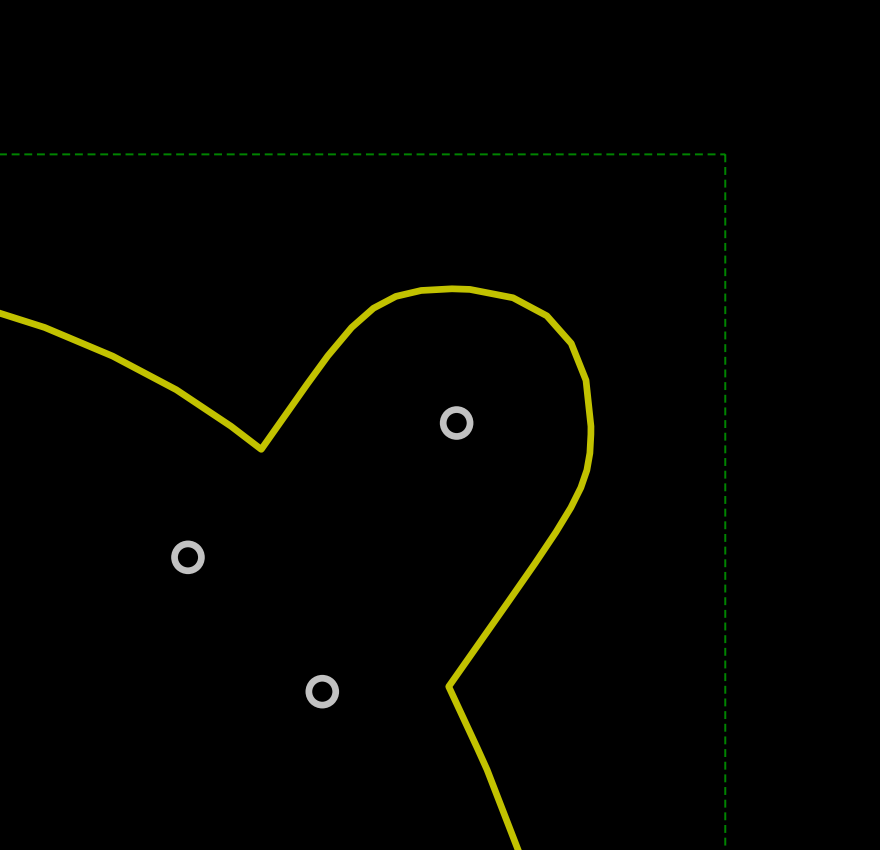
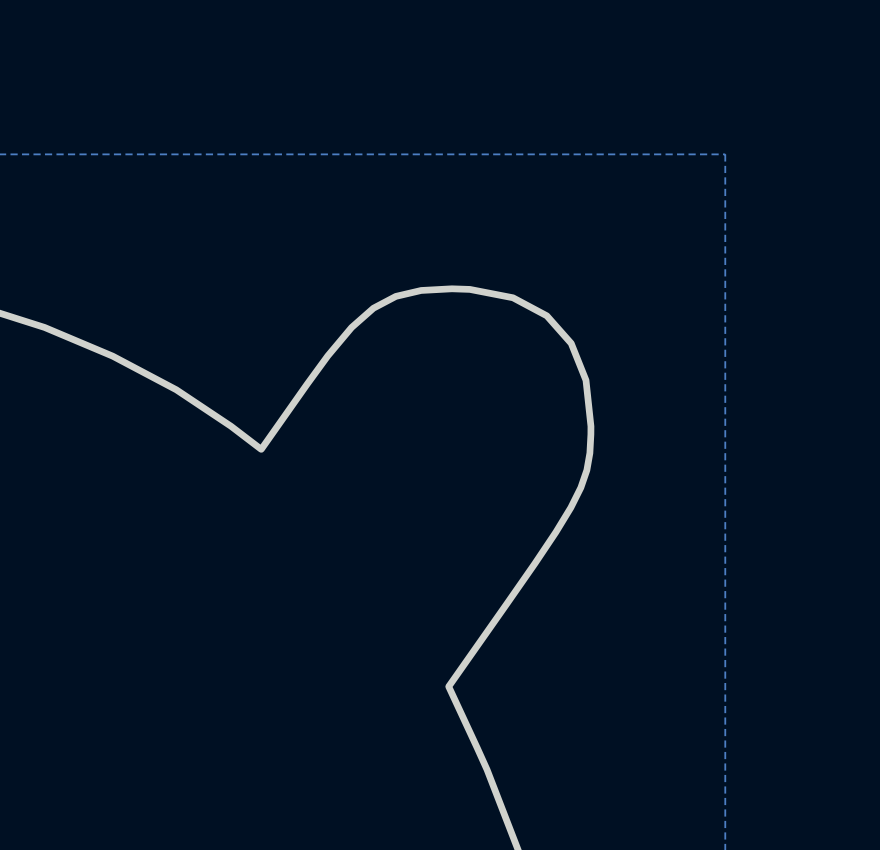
via: (456, 423) -> none
via: (187, 557) -> none
via: (322, 691) -> none

